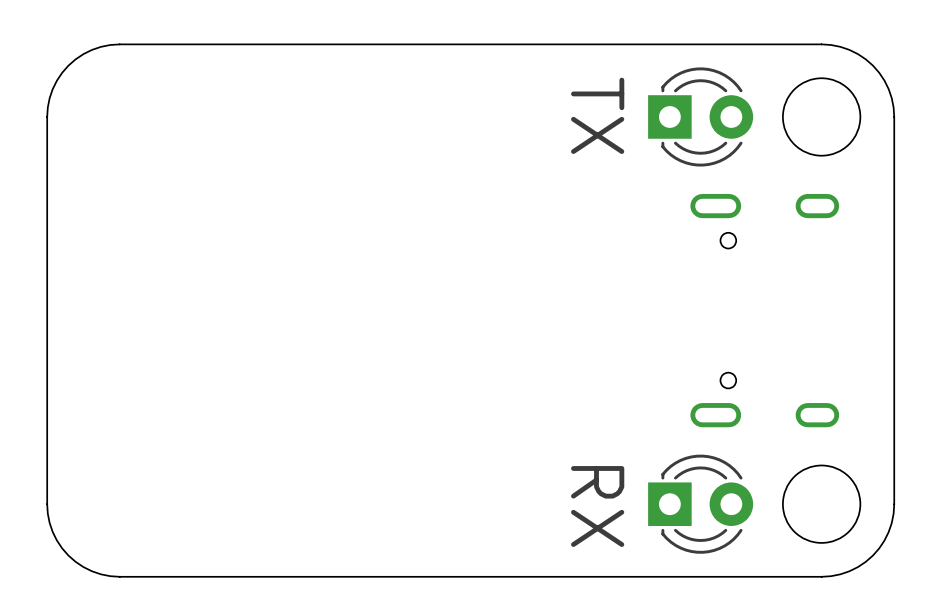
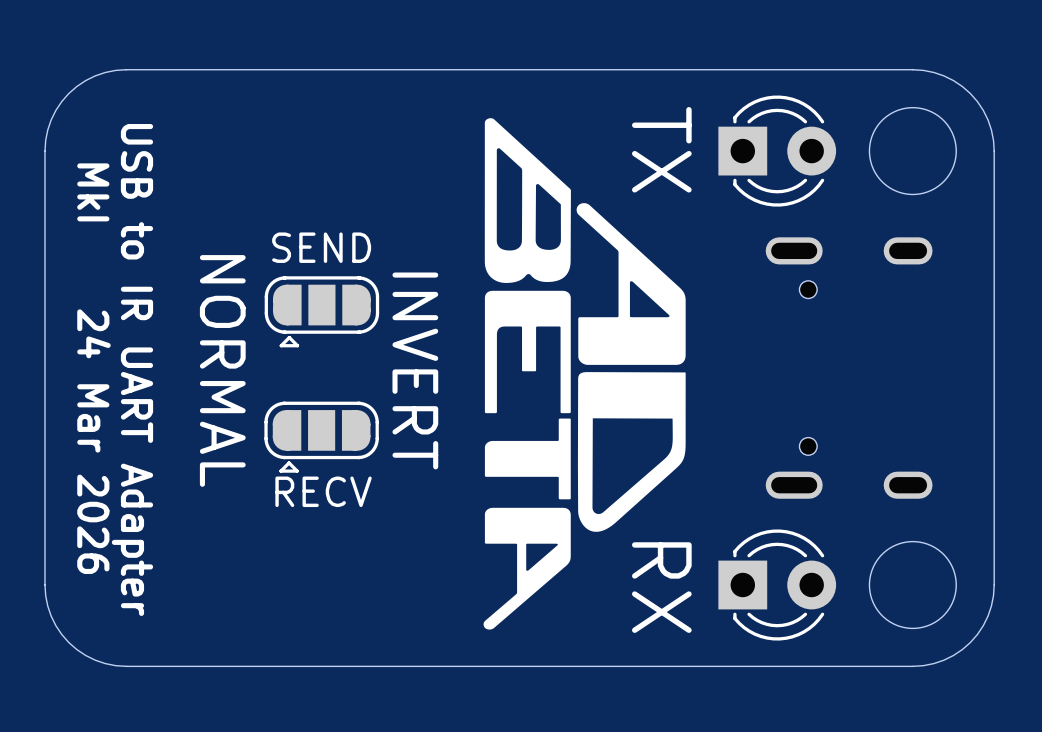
drawing: none -> [483, 118, 686, 630]
text: none -> SEND (321, 247)
part: none -> (321, 311)
text: none -> MkI 24 Mar 2026 (93, 368)
text: none -> USB to IR UART Adapter (132, 369)
text: none -> NORMAL (222, 370)
text: none -> INVERT (415, 370)
part: none -> (321, 437)
text: none -> RECV (323, 491)

